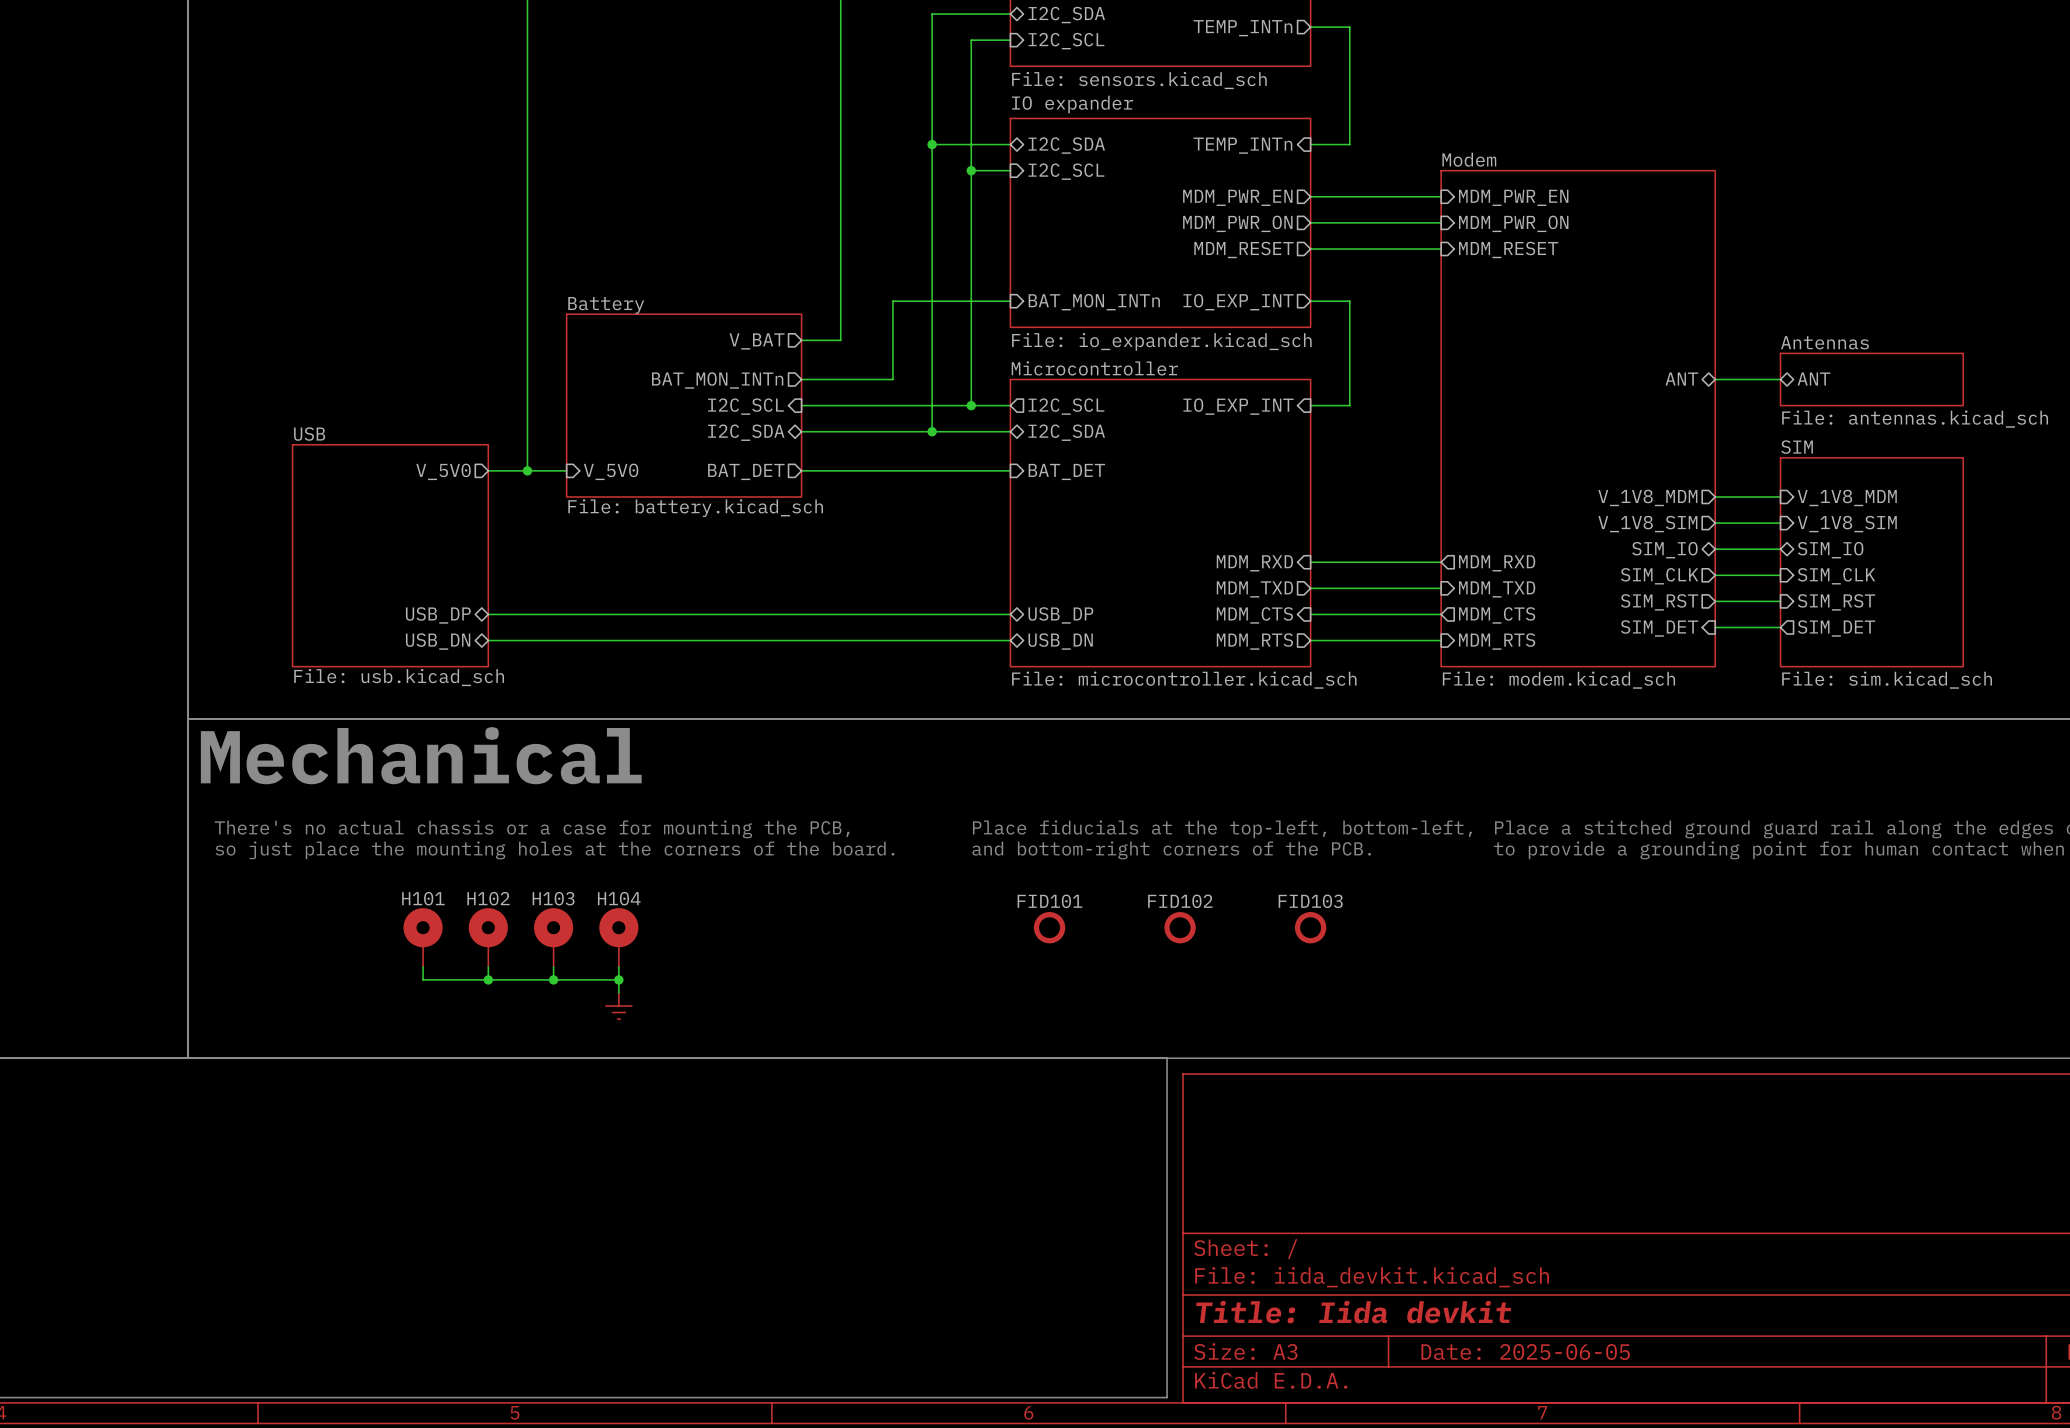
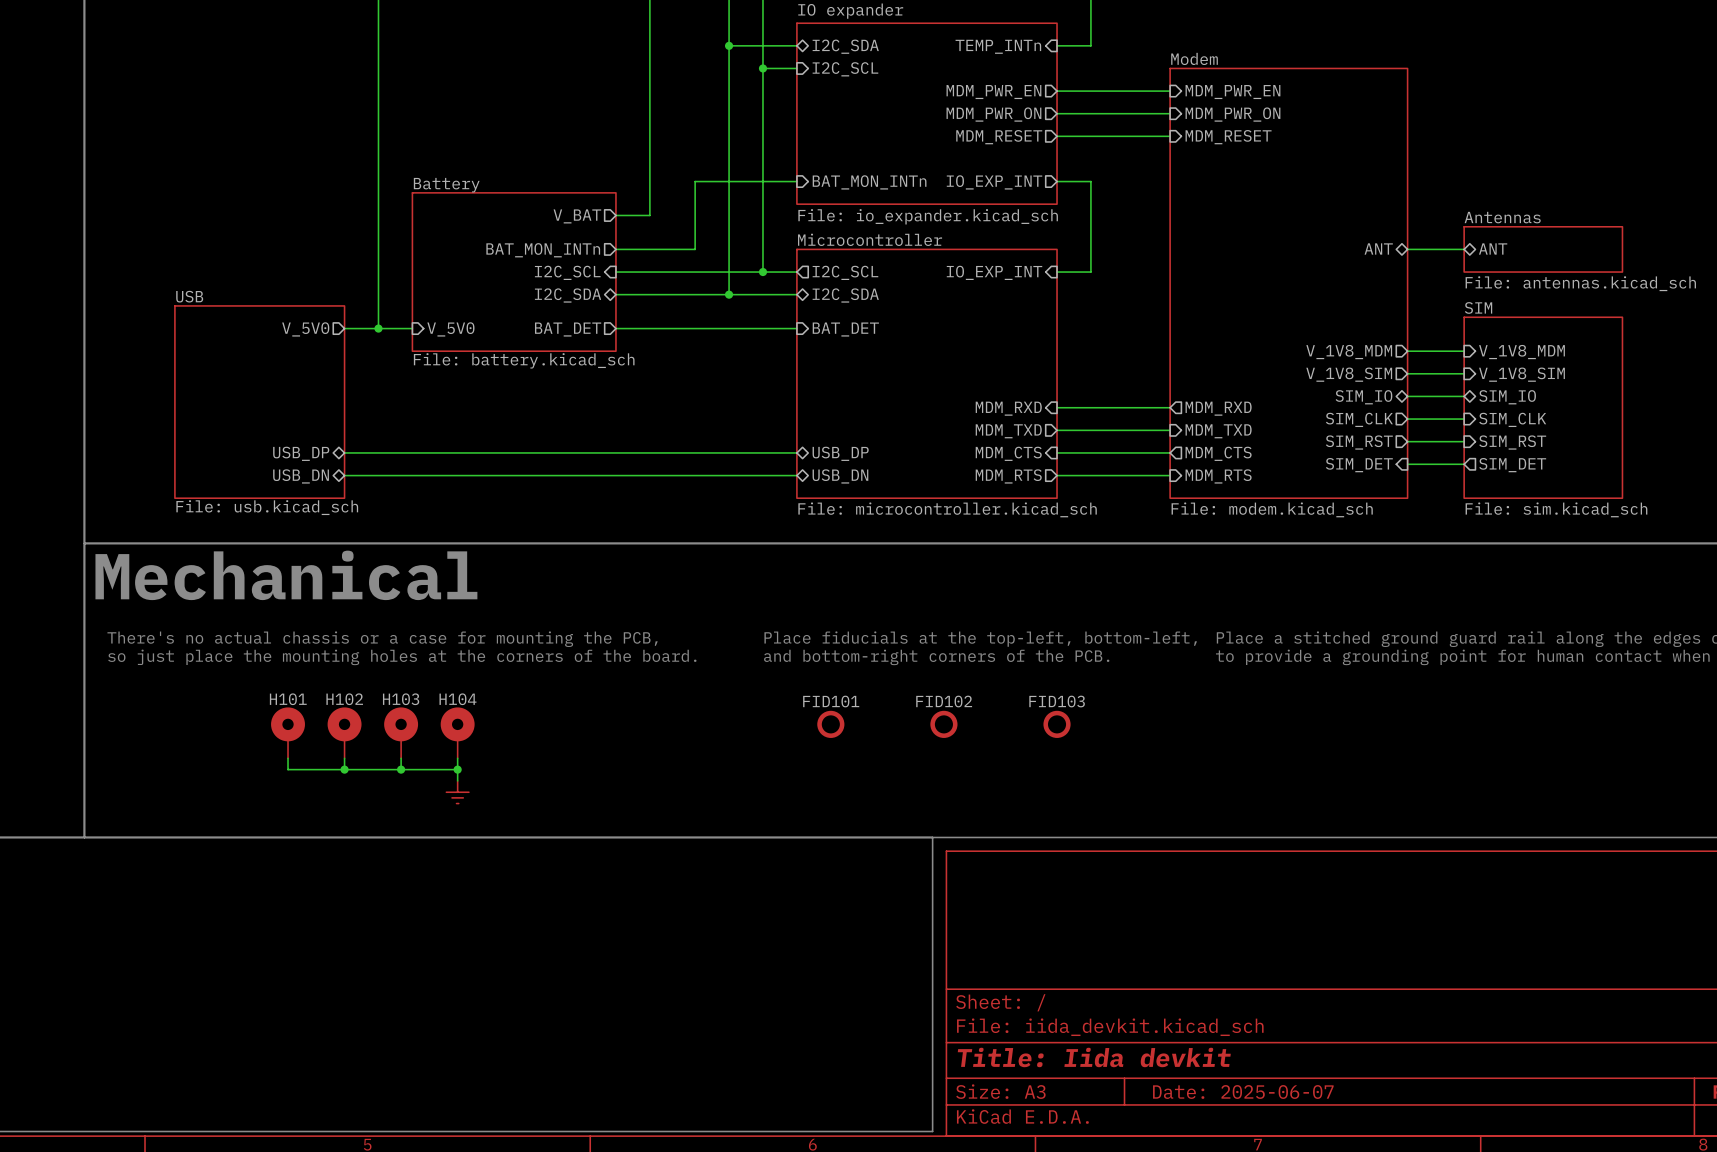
title block: Date: 2025-06-05 (1525, 1351) -> Date: 2025-06-07 (1243, 1092)

